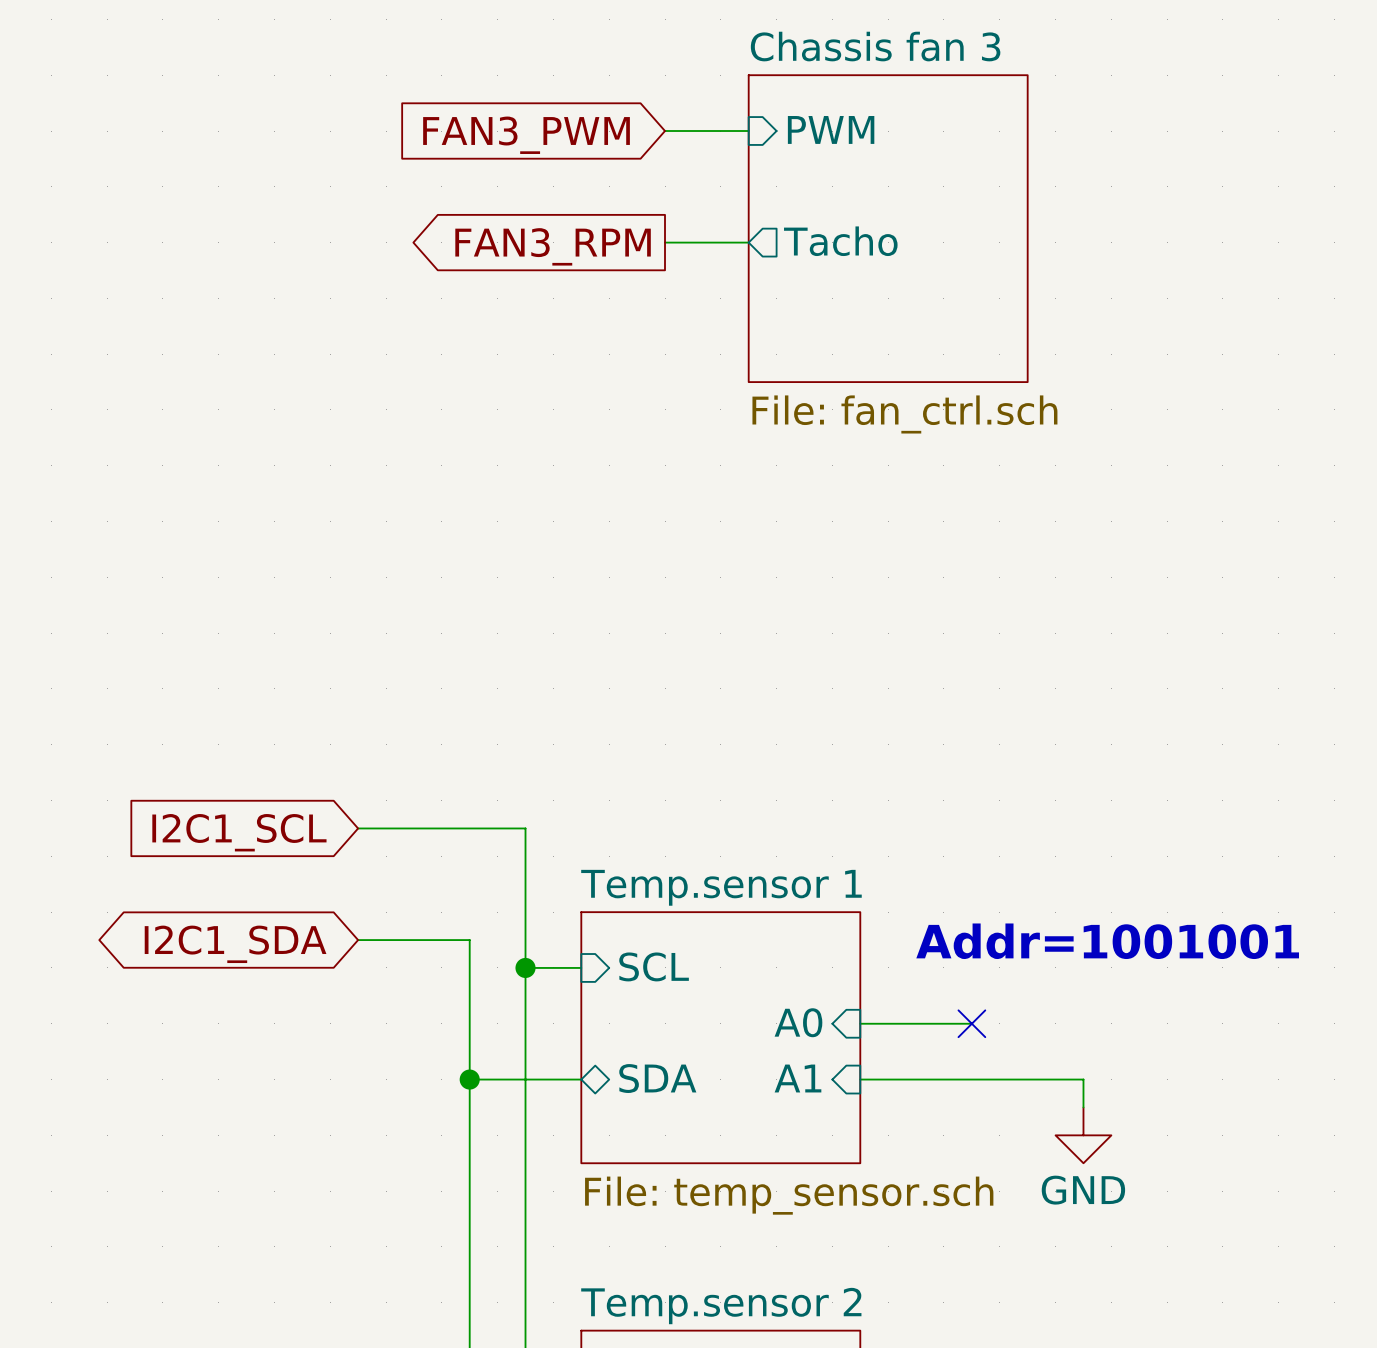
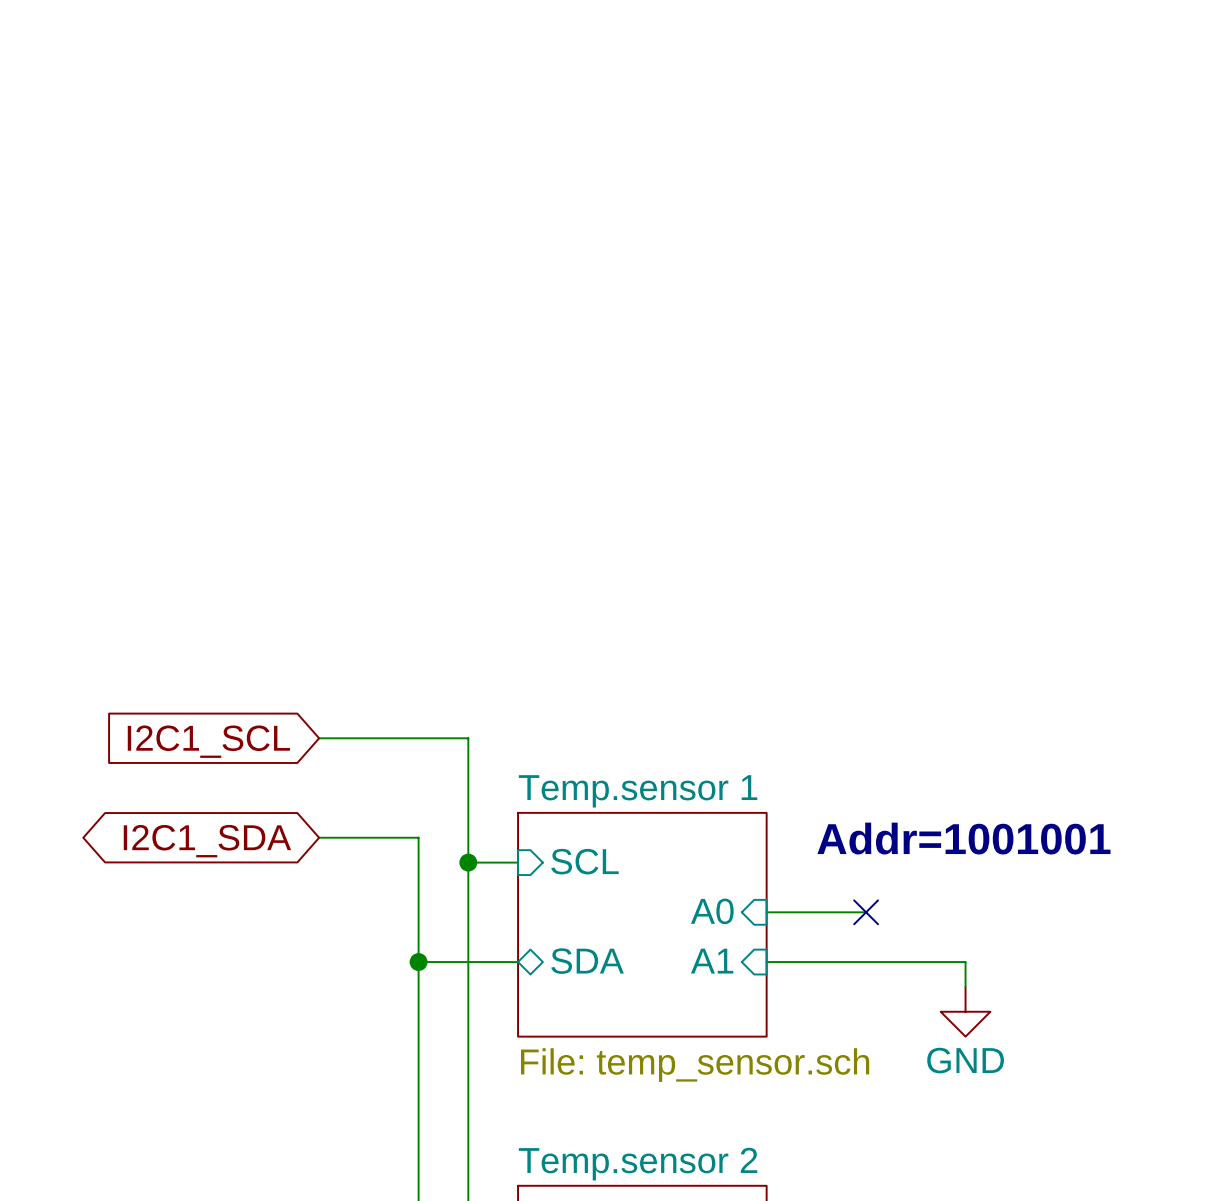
sheet pin: PWM (831, 129) -> none
wire: (665, 131) (748, 131) -> none
global label: FAN3_PWM (526, 135) -> none
sheet Chassis fan 3: File: fan_ctrl.sch (888, 228) -> none
sheet pin: Tacho (840, 241) -> none
wire: (665, 242) (748, 242) -> none
global label: FAN3_RPM (553, 246) -> none

